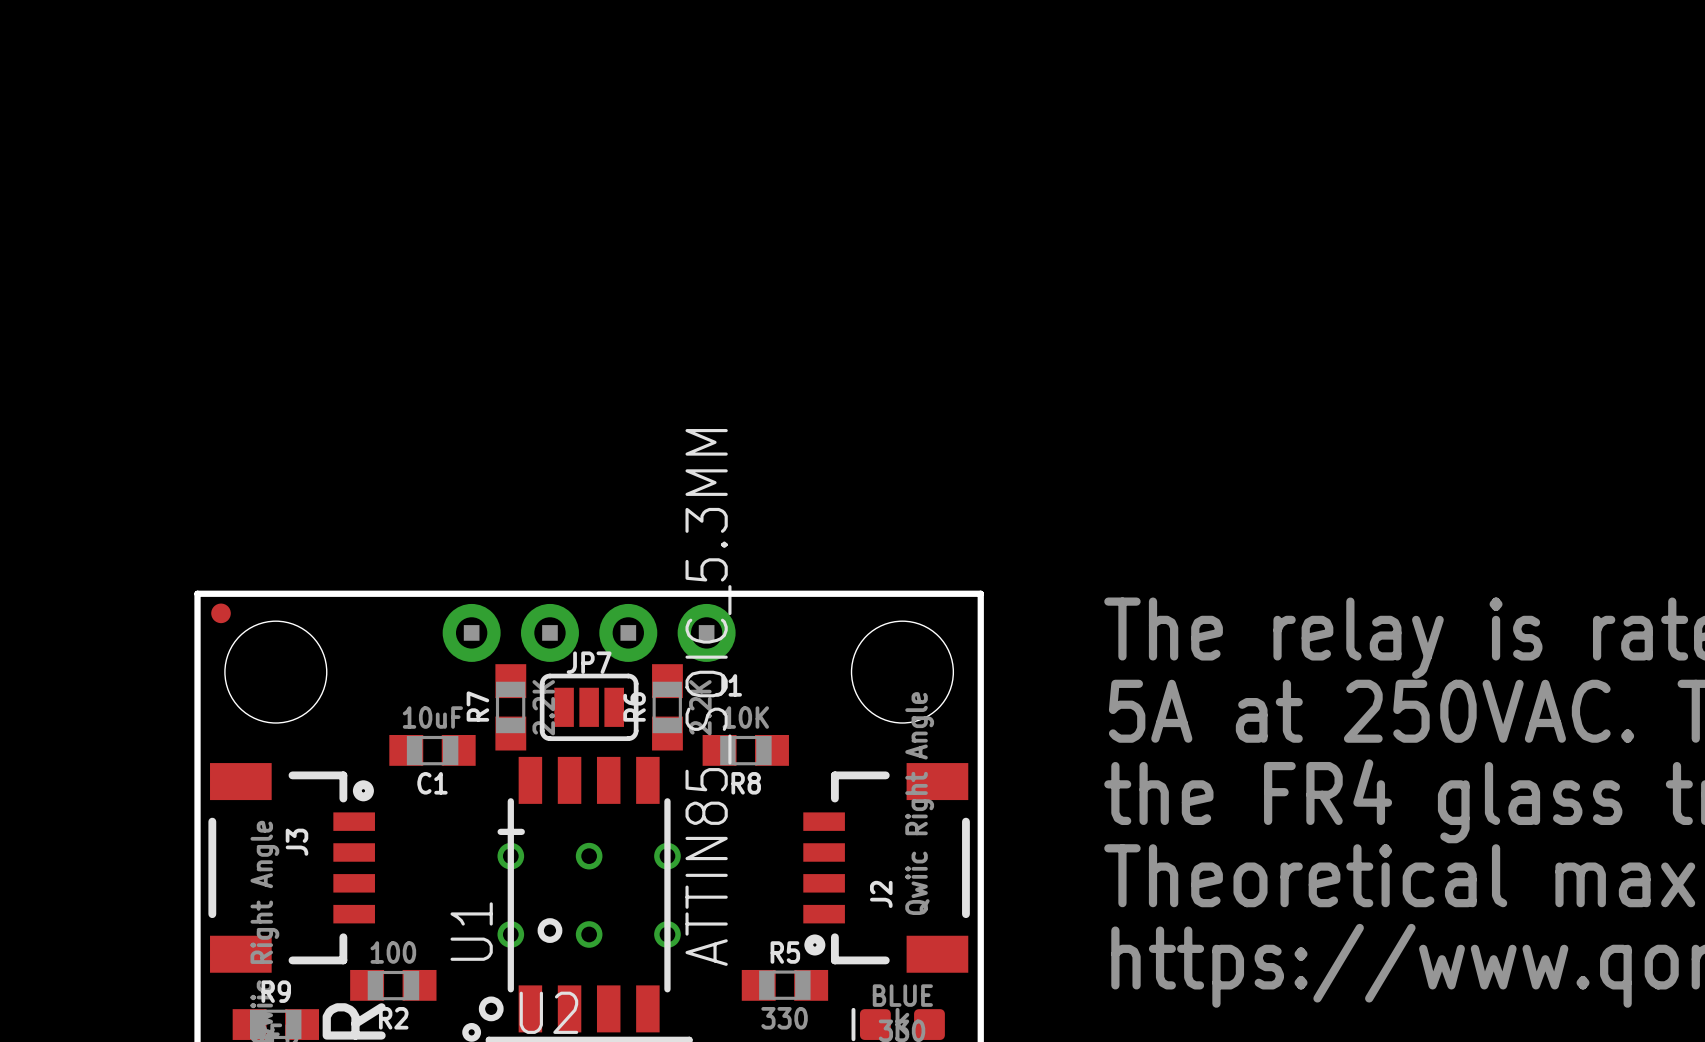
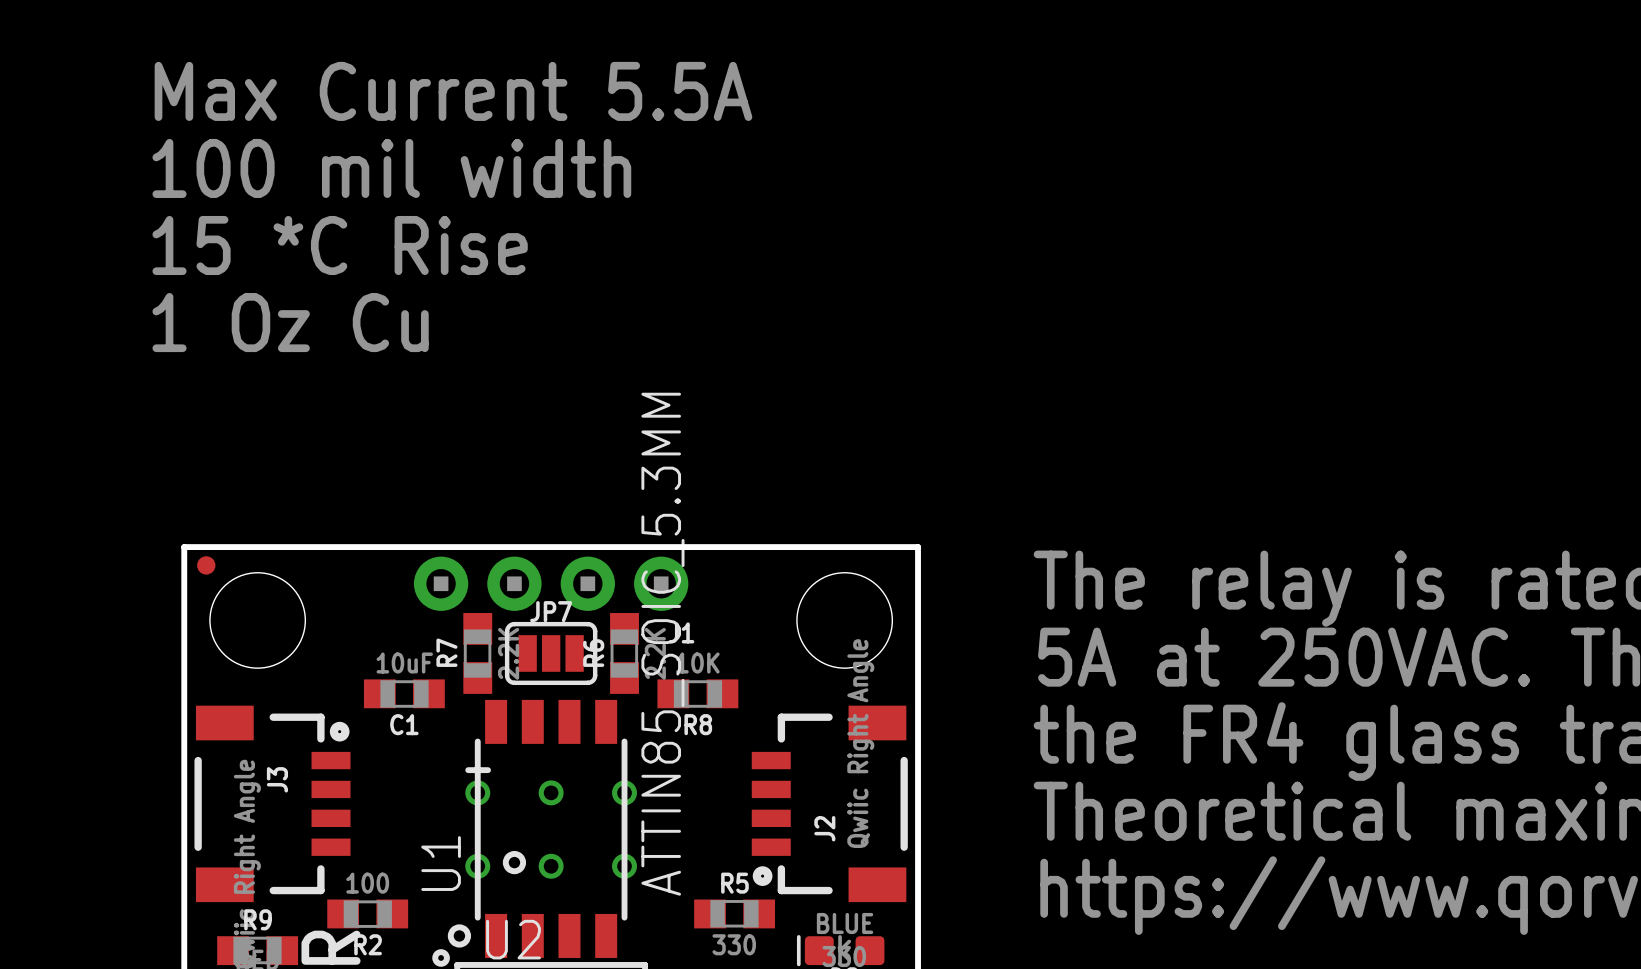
text: none -> Max Current 5.5A (453, 91)
text: none -> 100 mil width (391, 168)
text: none -> 15 *C Rise (340, 245)
text: none -> 1 Oz Cu (290, 322)

